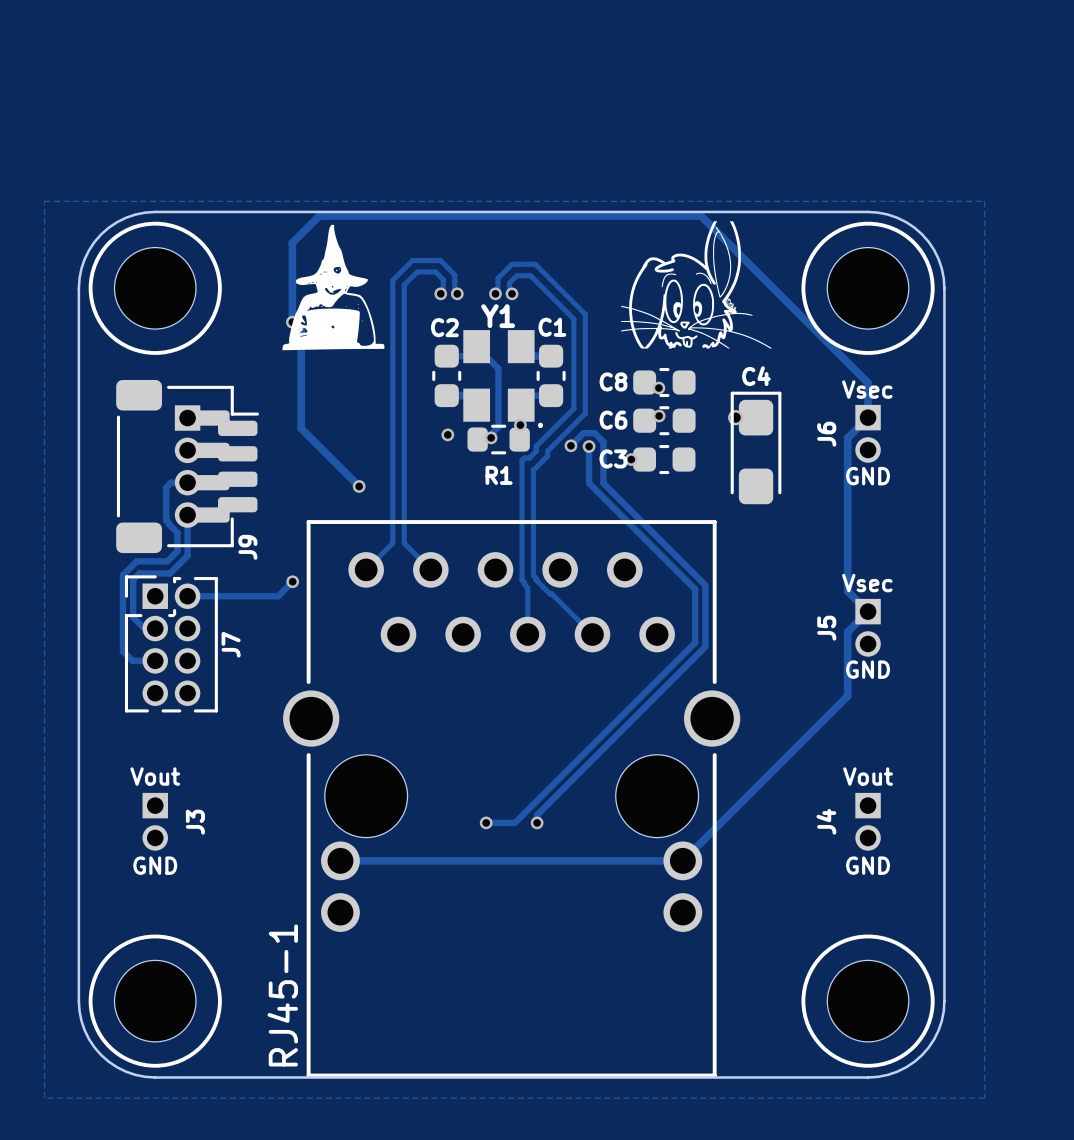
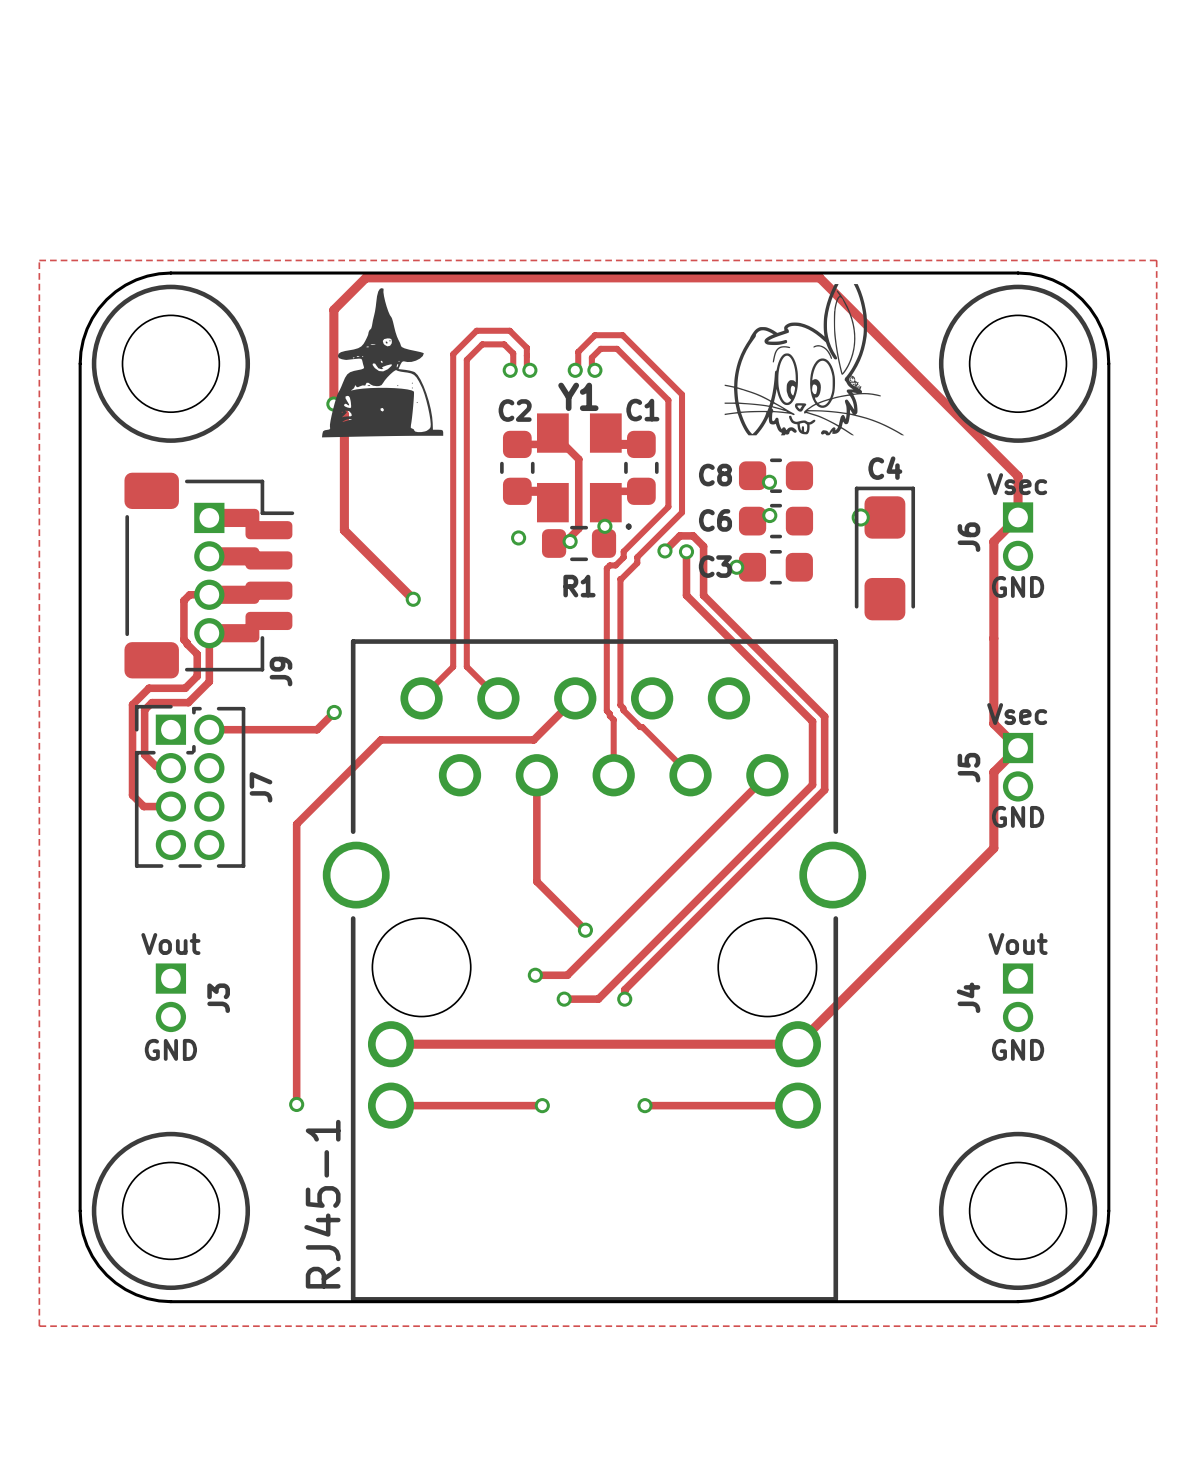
track: none -> (575, 698) (533, 739) (380, 739) (296, 824) (296, 1104)
track: none -> (536, 775) (536, 881) (585, 930)
track: none -> (767, 775) (567, 975) (535, 975)
via: none -> (585, 930)
via: none -> (535, 975)
via: none -> (296, 1104)
track: none -> (391, 1105) (542, 1105)
via: none -> (542, 1105)
track: none -> (644, 1105) (797, 1105)
via: none -> (644, 1105)

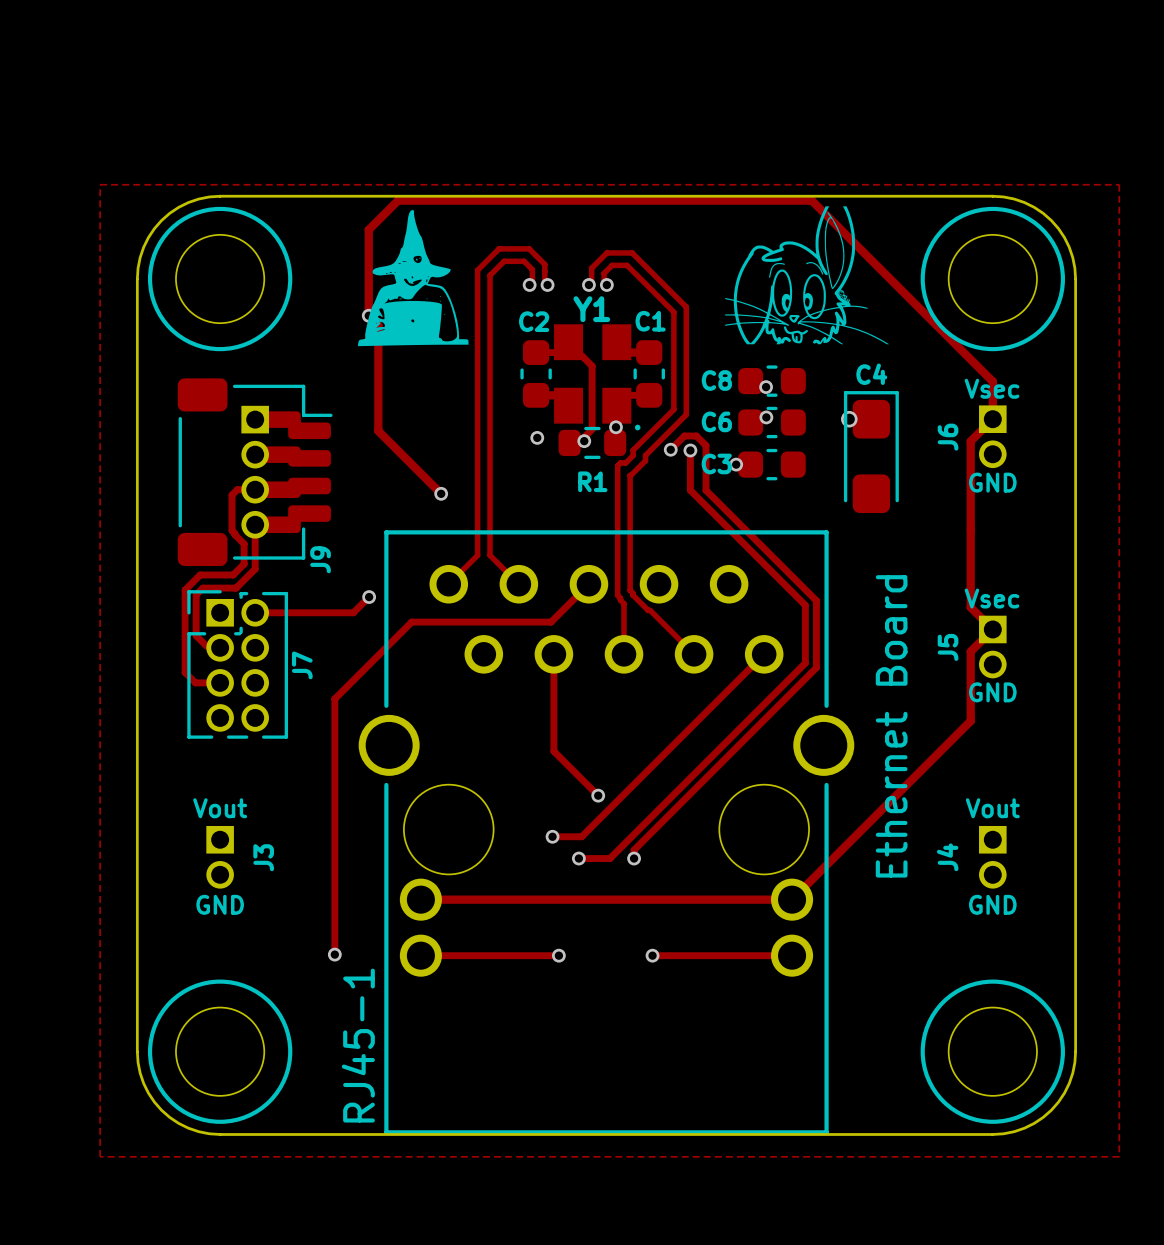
text: none -> Ethernet Board (891, 726)

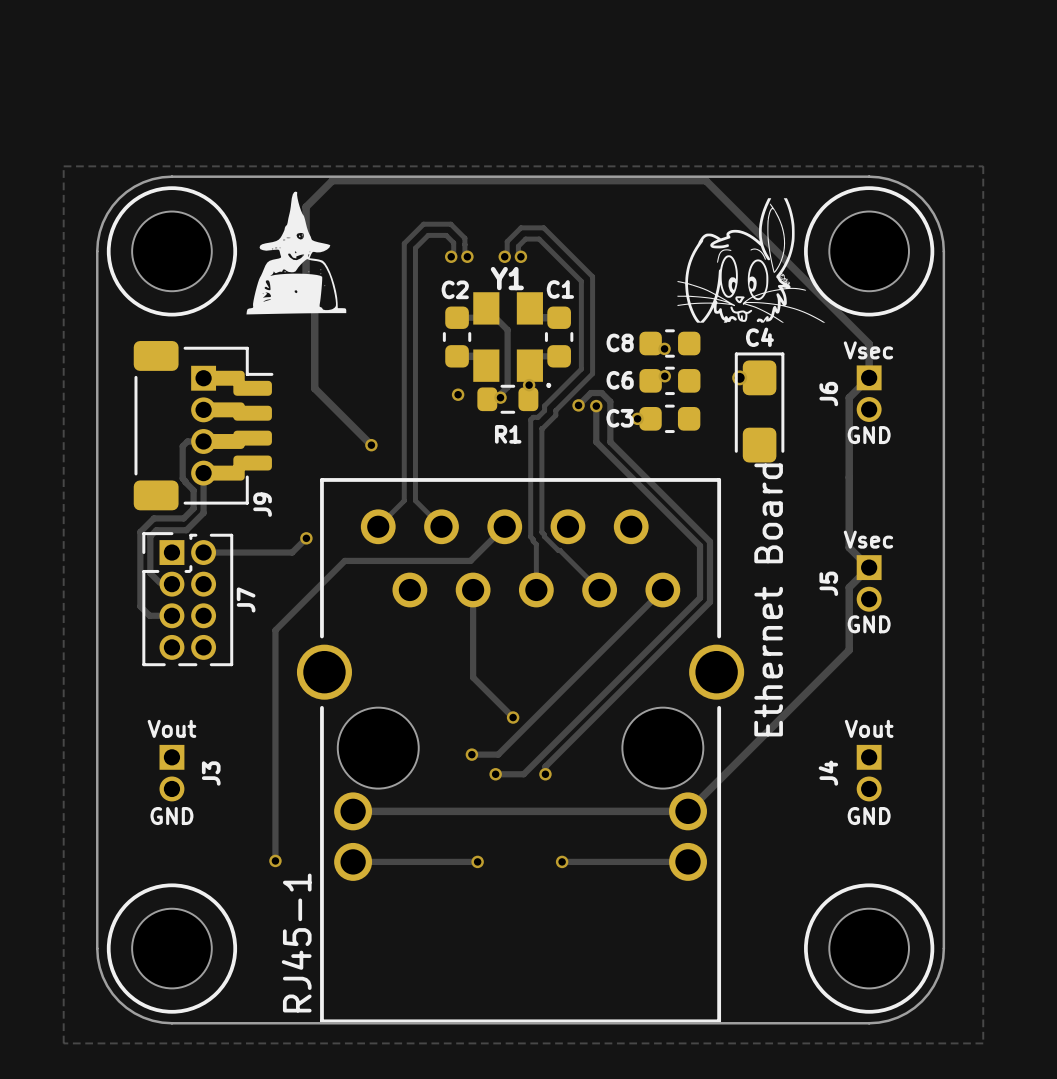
drawing position: (807, 275) -> (751, 260)
drawing position: (413, 278) -> (296, 253)
text position: Ethernet Board (891, 726) -> Ethernet Board (768, 599)

